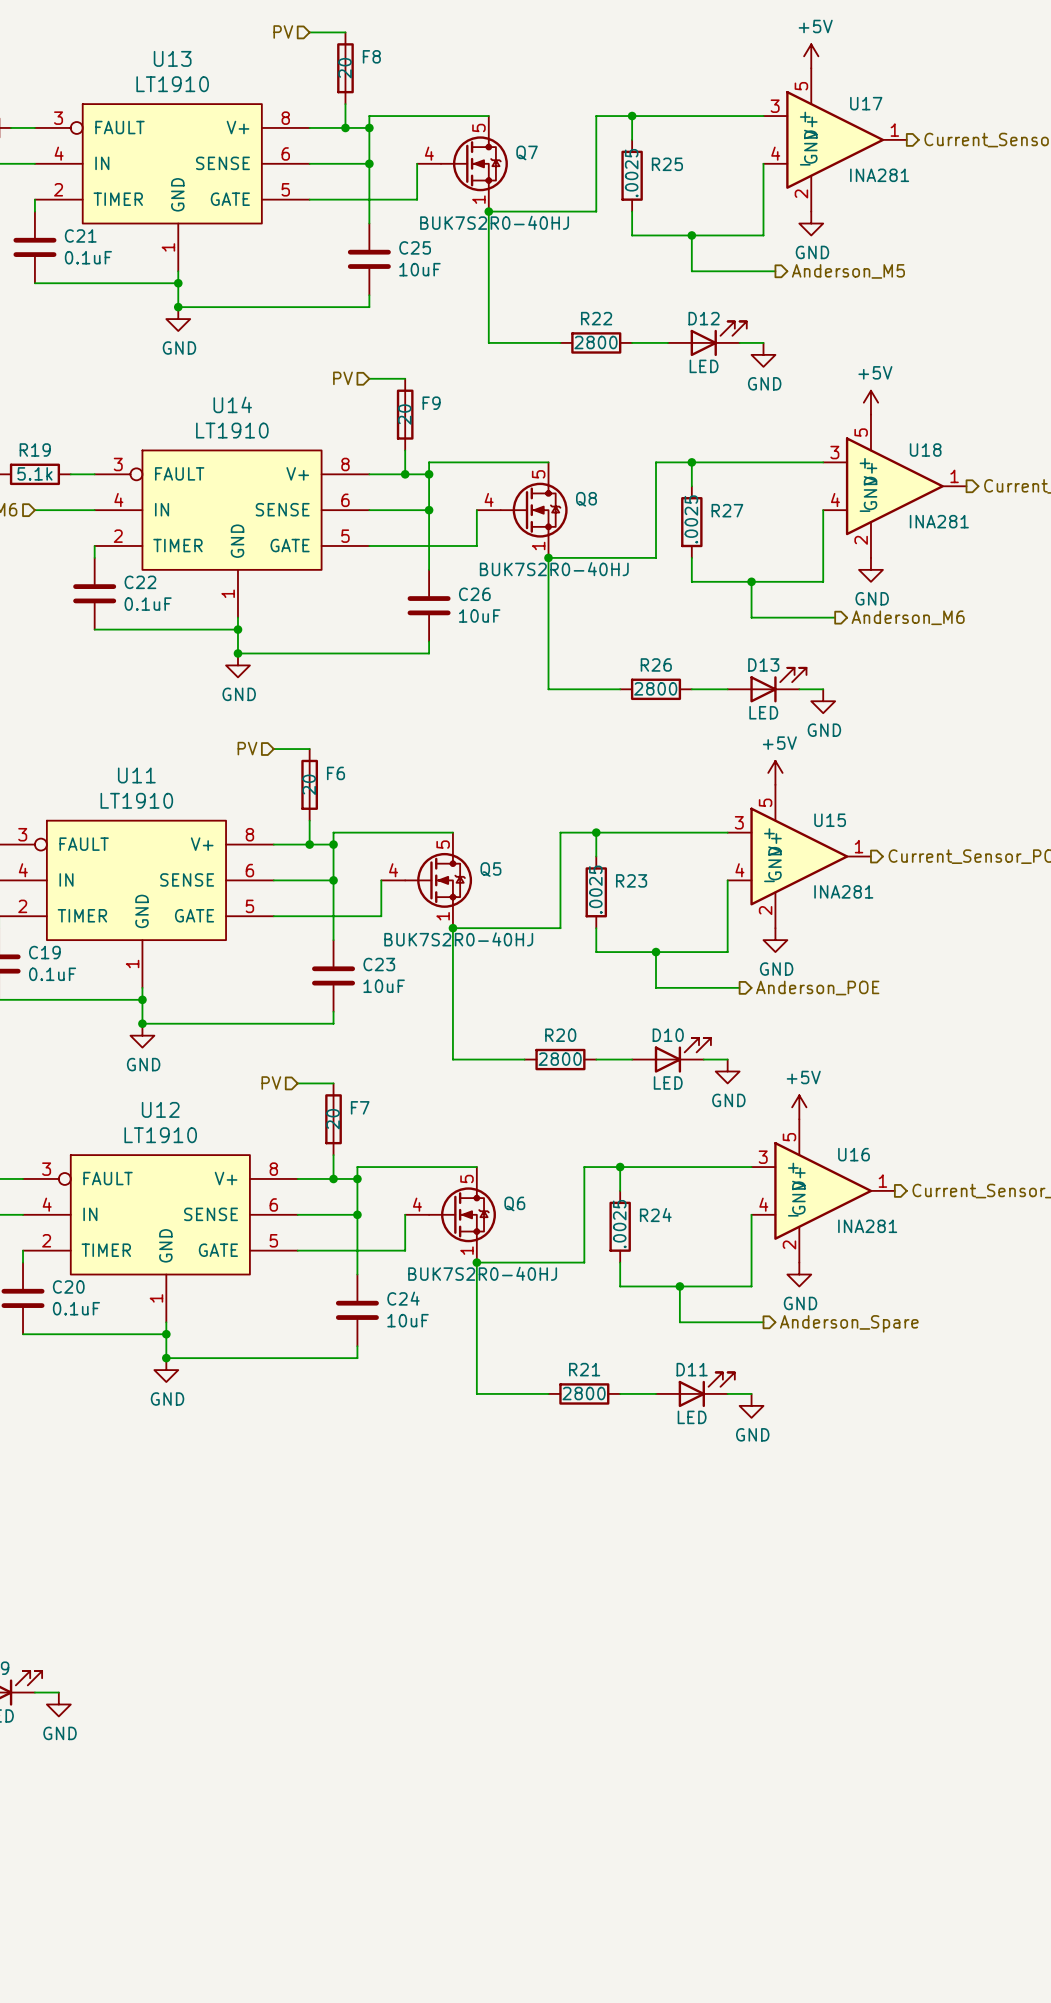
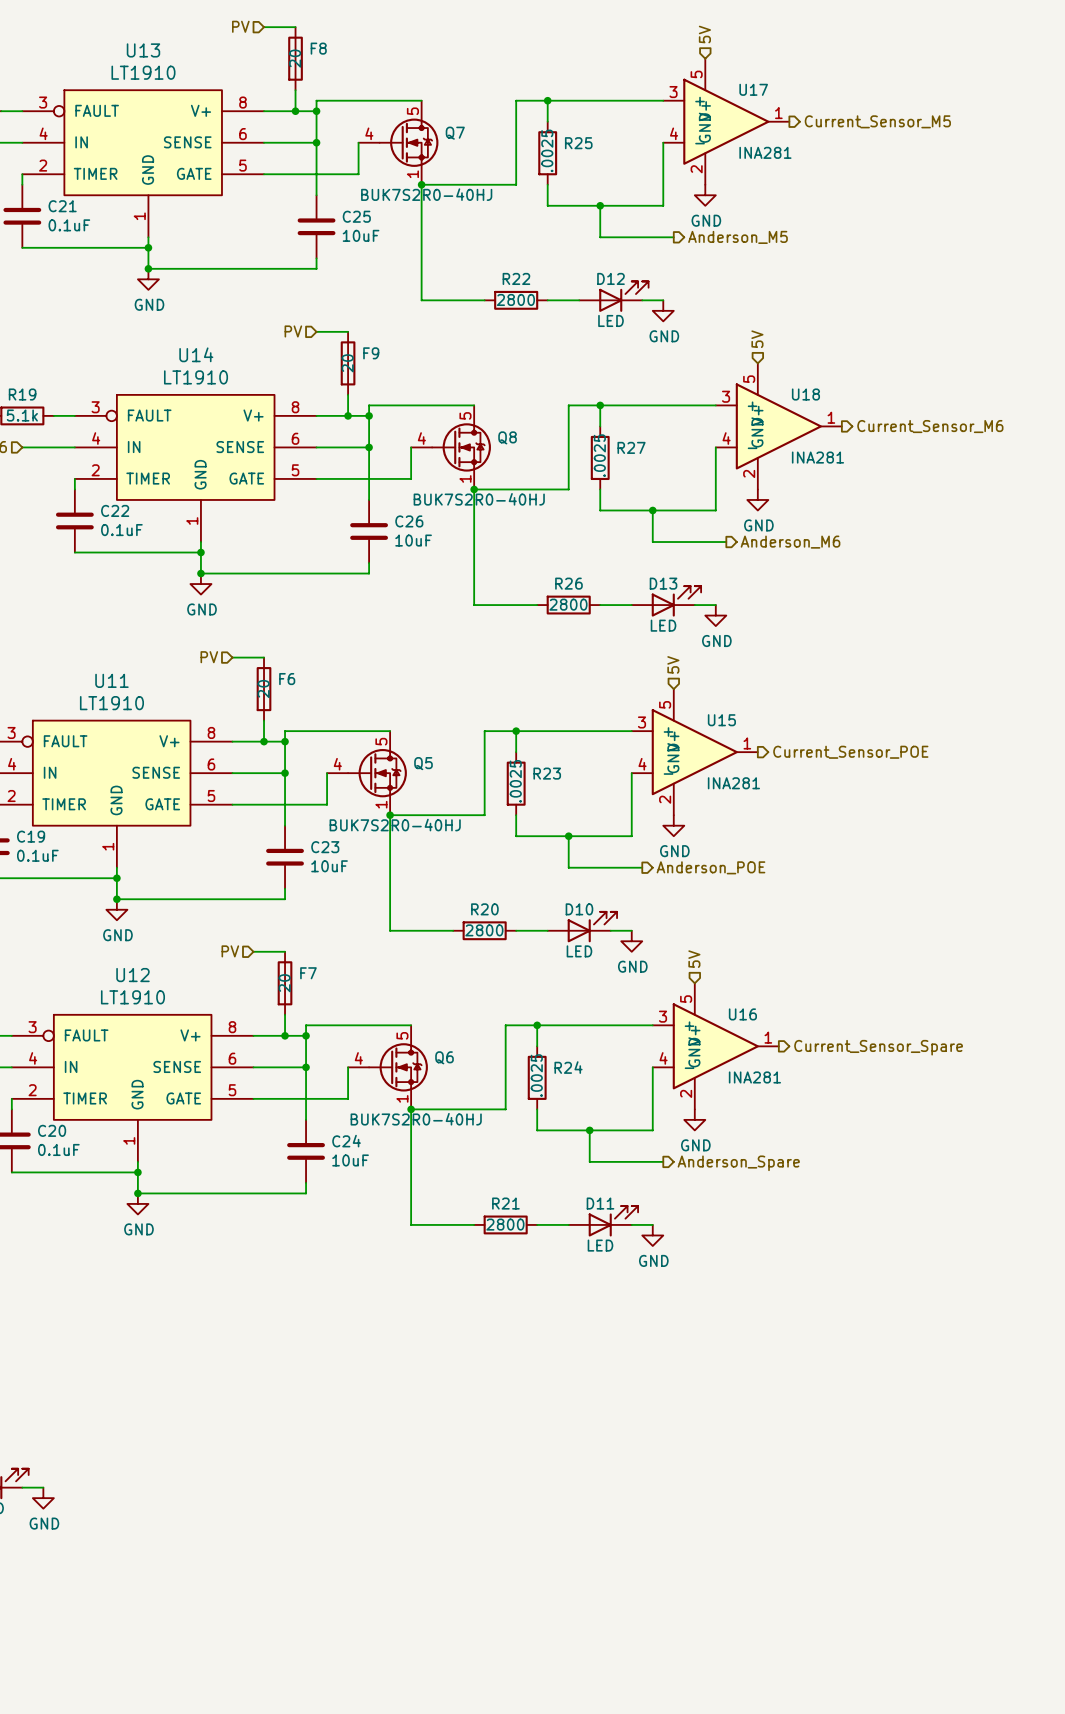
hierarchical label: none -> 5V (704, 34)
power symbol: +5V (811, 56) -> none
hierarchical label: none -> 5V (757, 339)
power symbol: +5V (870, 402) -> none
hierarchical label: none -> 5V (673, 664)
power symbol: +5V (775, 772) -> none
hierarchical label: none -> 5V (694, 959)
power symbol: +5V (799, 1107) -> none

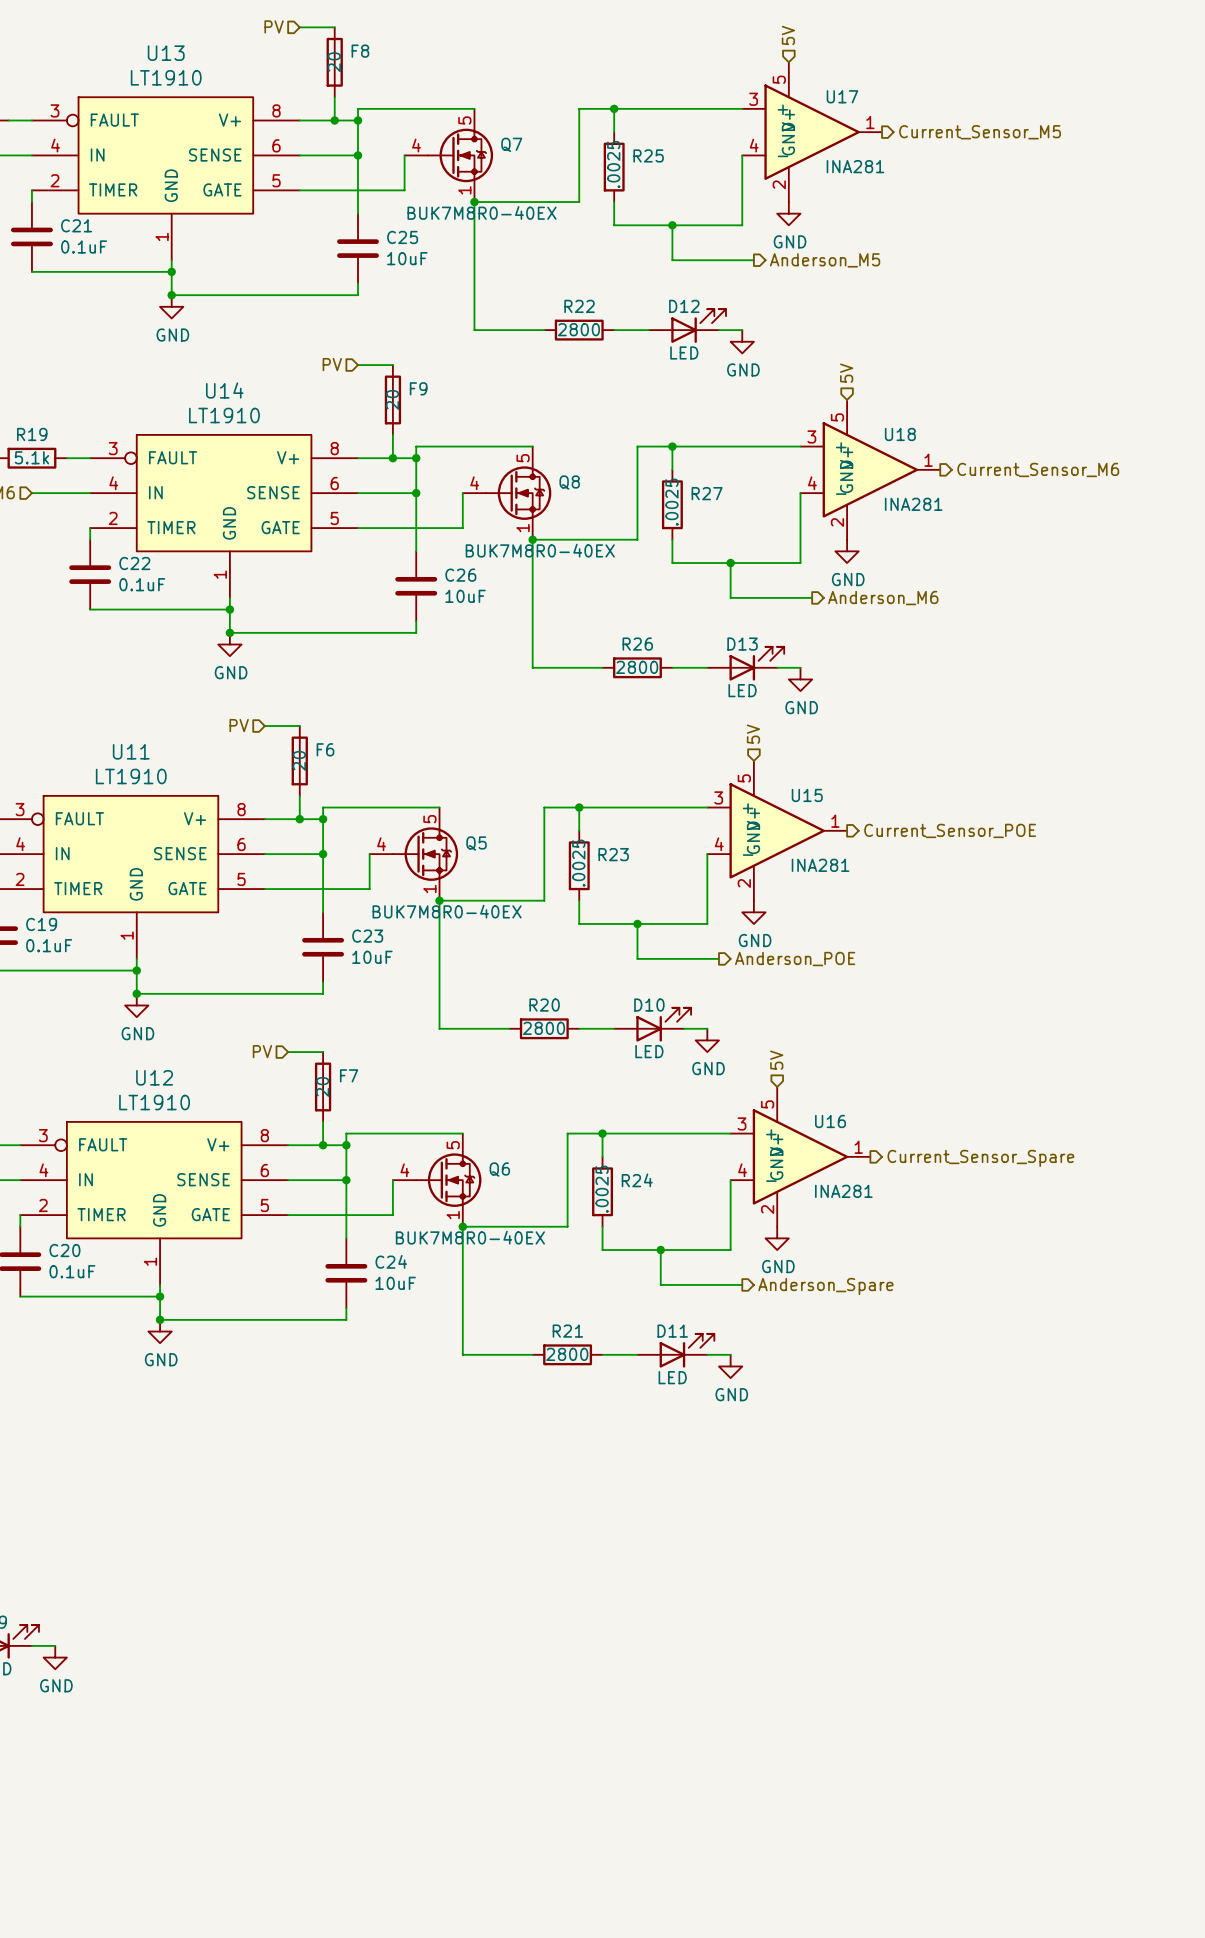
Q7 value: BUK7S2R0-40HJ (426, 194) -> BUK7M8R0-40EX (482, 212)
Q8 value: BUK7S2R0-40HJ (479, 499) -> BUK7M8R0-40EX (540, 550)
Q5 value: BUK7S2R0-40HJ (395, 825) -> BUK7M8R0-40EX (447, 911)
Q6 value: BUK7S2R0-40HJ (416, 1119) -> BUK7M8R0-40EX (470, 1237)

